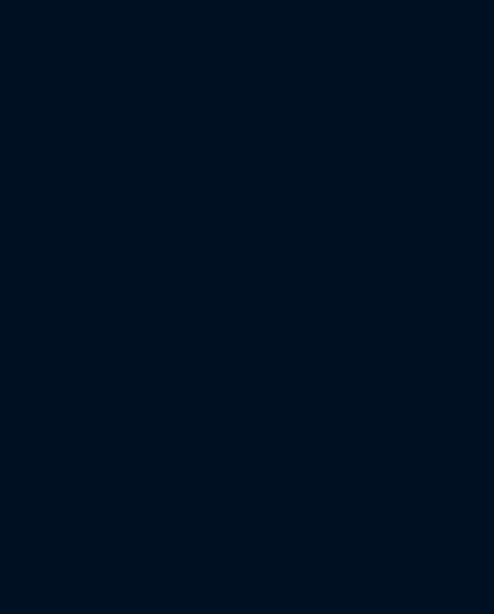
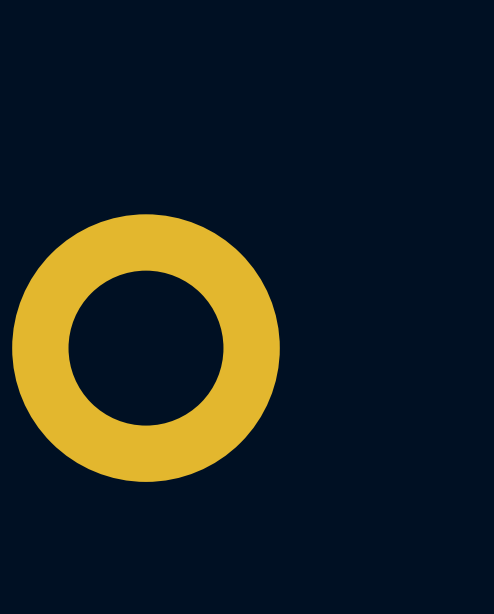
part: none -> (145, 348)

